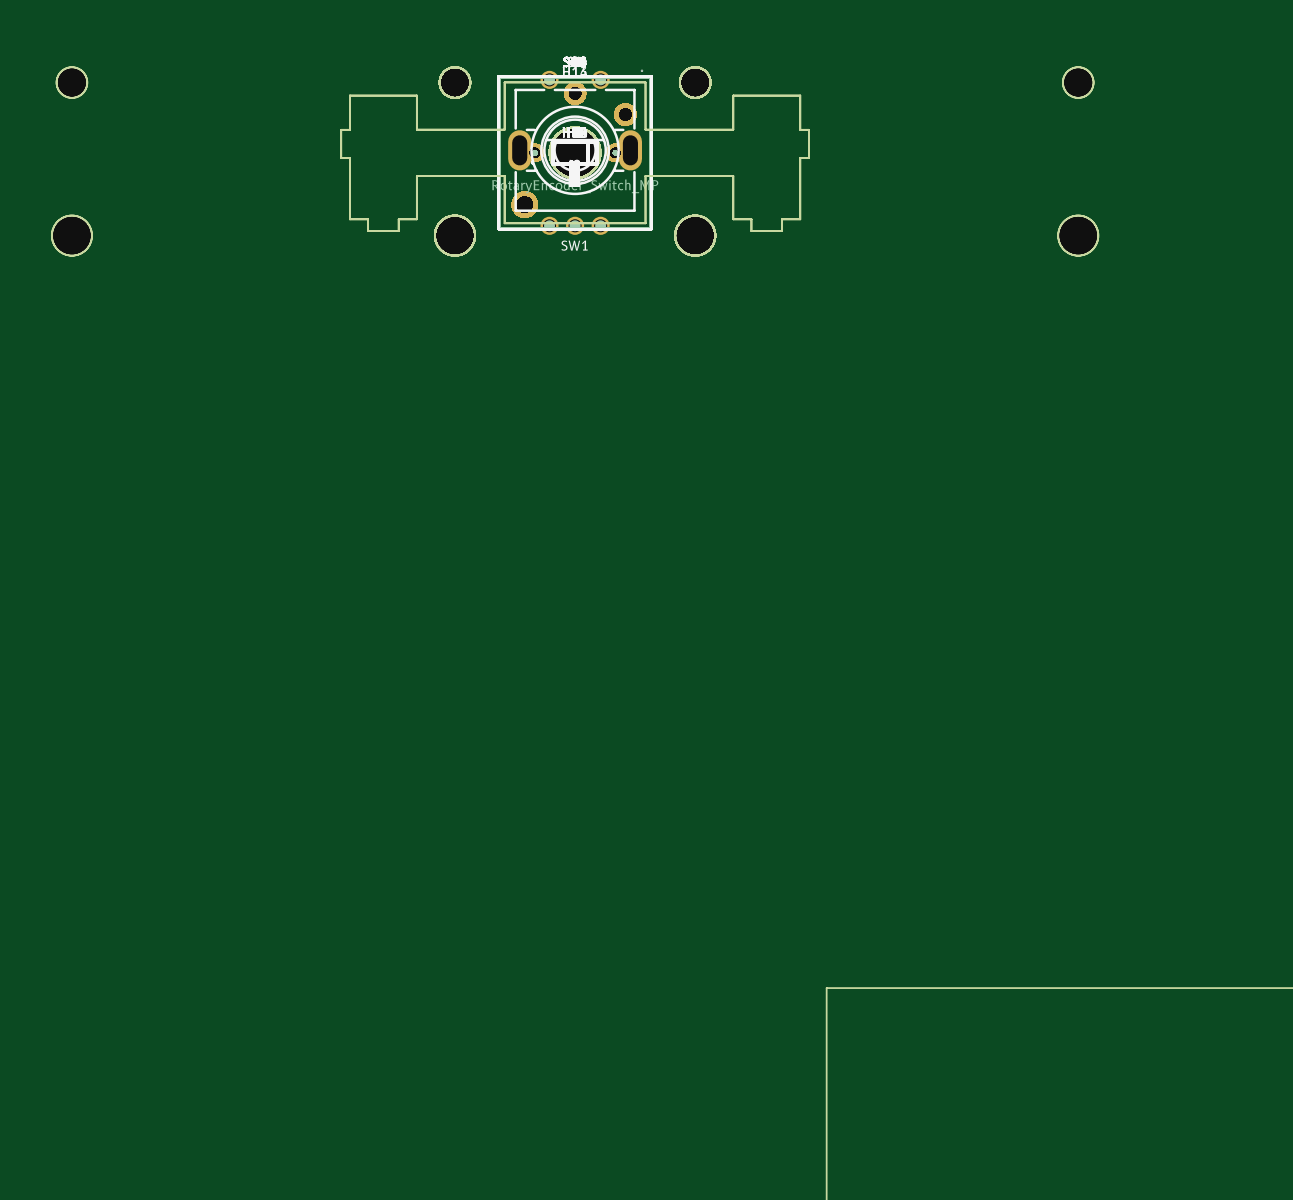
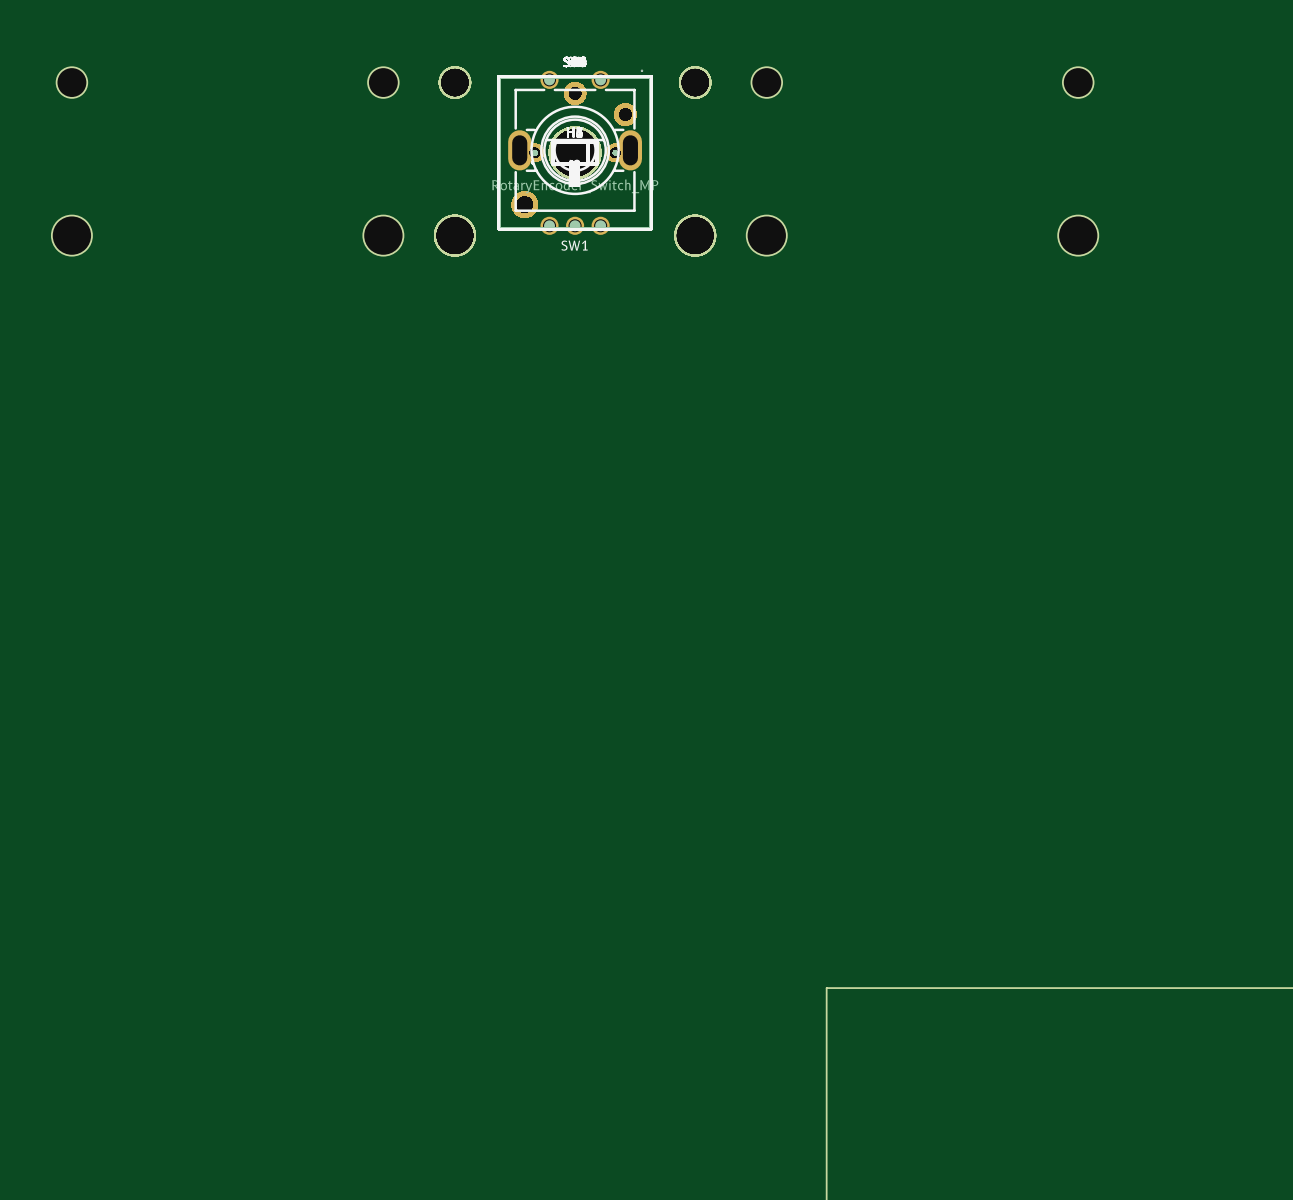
part footprint: [434, 67, 716, 256] -> [363, 67, 787, 256]
part footprint: [434, 67, 716, 256] -> [51, 67, 1099, 256]
part: (575, 156) -> none
part: (575, 156) -> none
part: (575, 161) -> none
part: (575, 161) -> none
part: (575, 161) -> none
part: (575, 161) -> none
part: (575, 161) -> none
part: (575, 161) -> none

